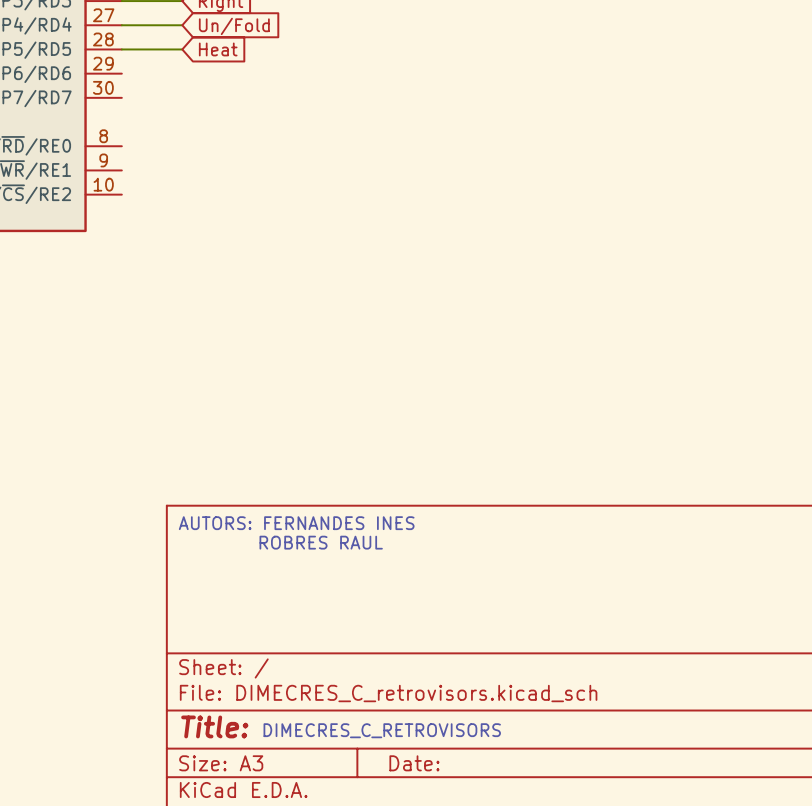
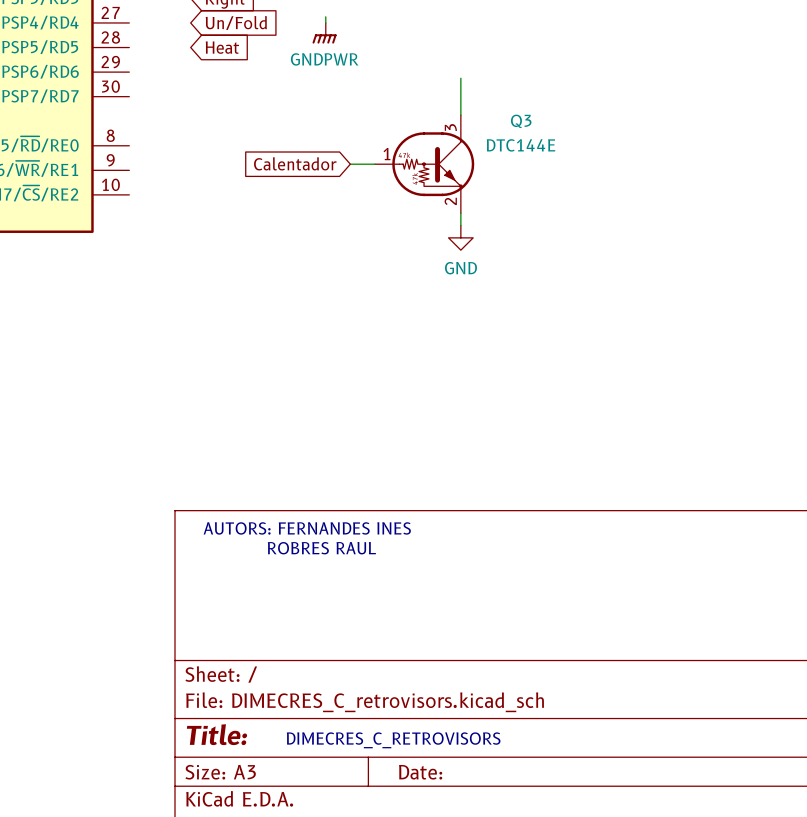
wire: none -> (325, 16) (325, 22)
wire: (121, 25) (182, 25) -> none
power symbol: none -> GNDPWR (324, 33)
wire: (121, 49) (182, 49) -> none
wire: none -> (460, 78) (460, 115)
global label: none -> Calentador (295, 163)
wire: none -> (350, 164) (374, 164)
Q3: none -> DTC144E (424, 164)
wire: none -> (460, 213) (460, 225)
power symbol: none -> GND (460, 237)

